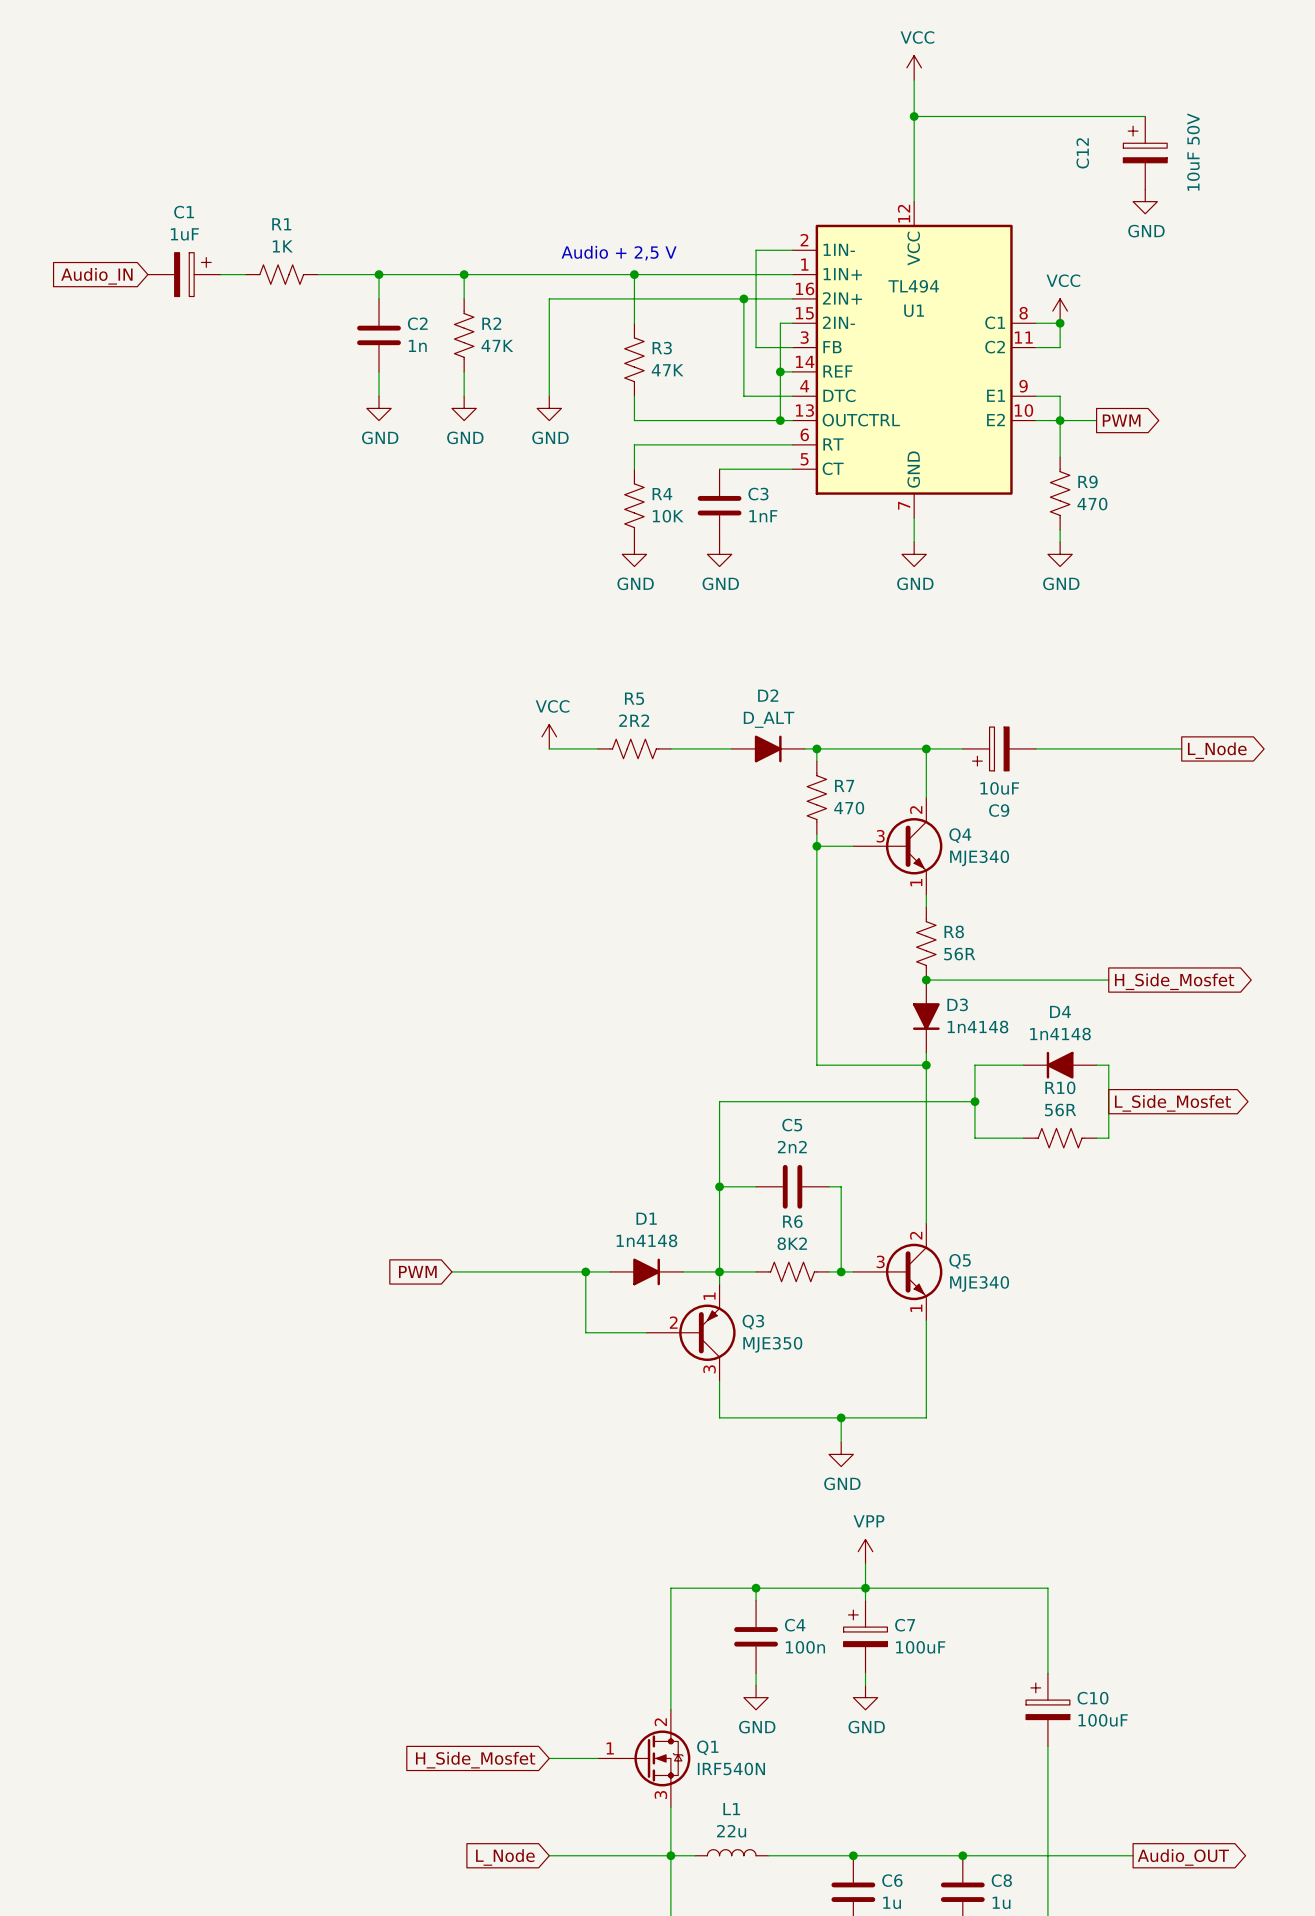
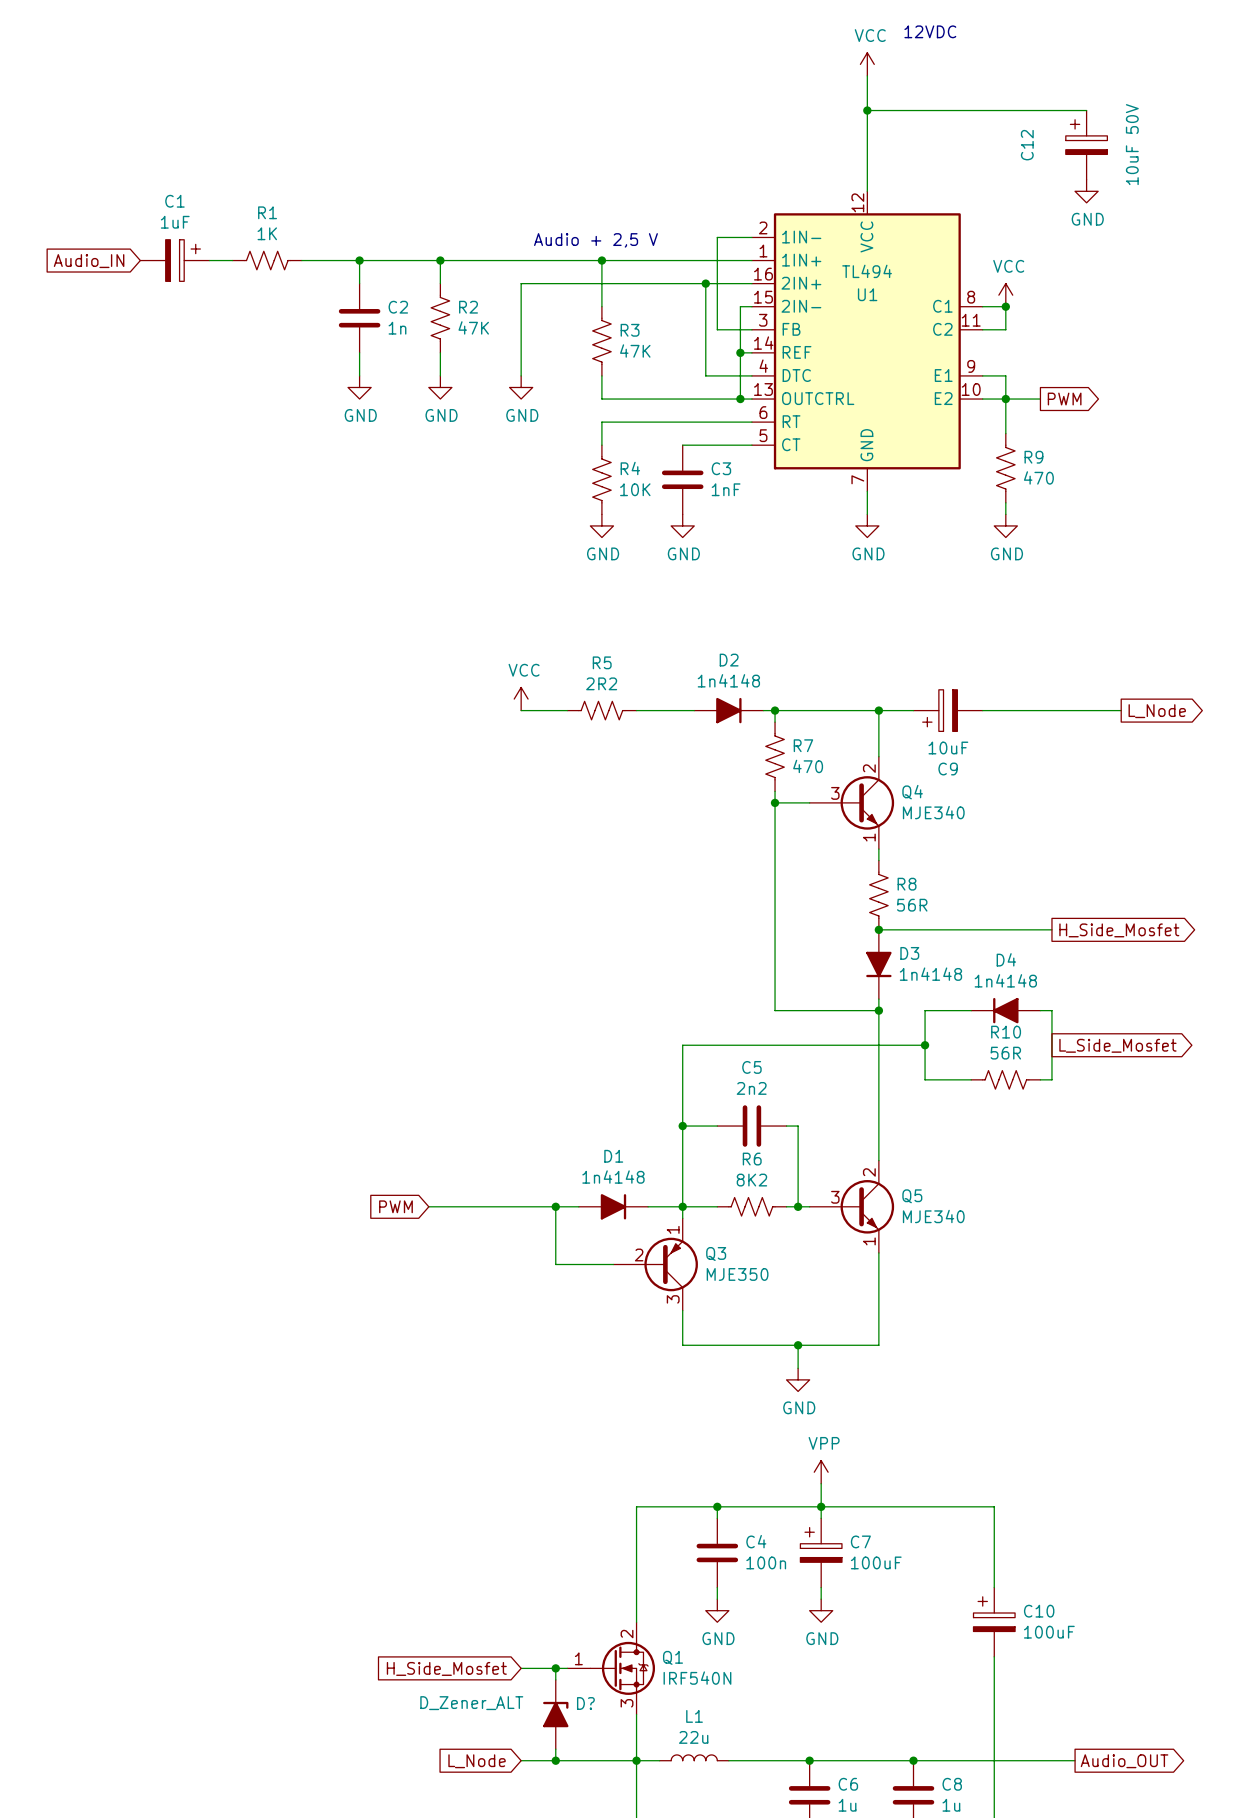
text: none -> 12VDC (930, 31)
D2 value: D_ALT (769, 719) -> 1n4148 (728, 680)
wire: none -> (555, 1668) (555, 1679)
junction: none -> (555, 1668)
D?: none -> D_Zener_ALT (555, 1714)
wire: none -> (555, 1749) (555, 1760)
junction: none -> (555, 1760)

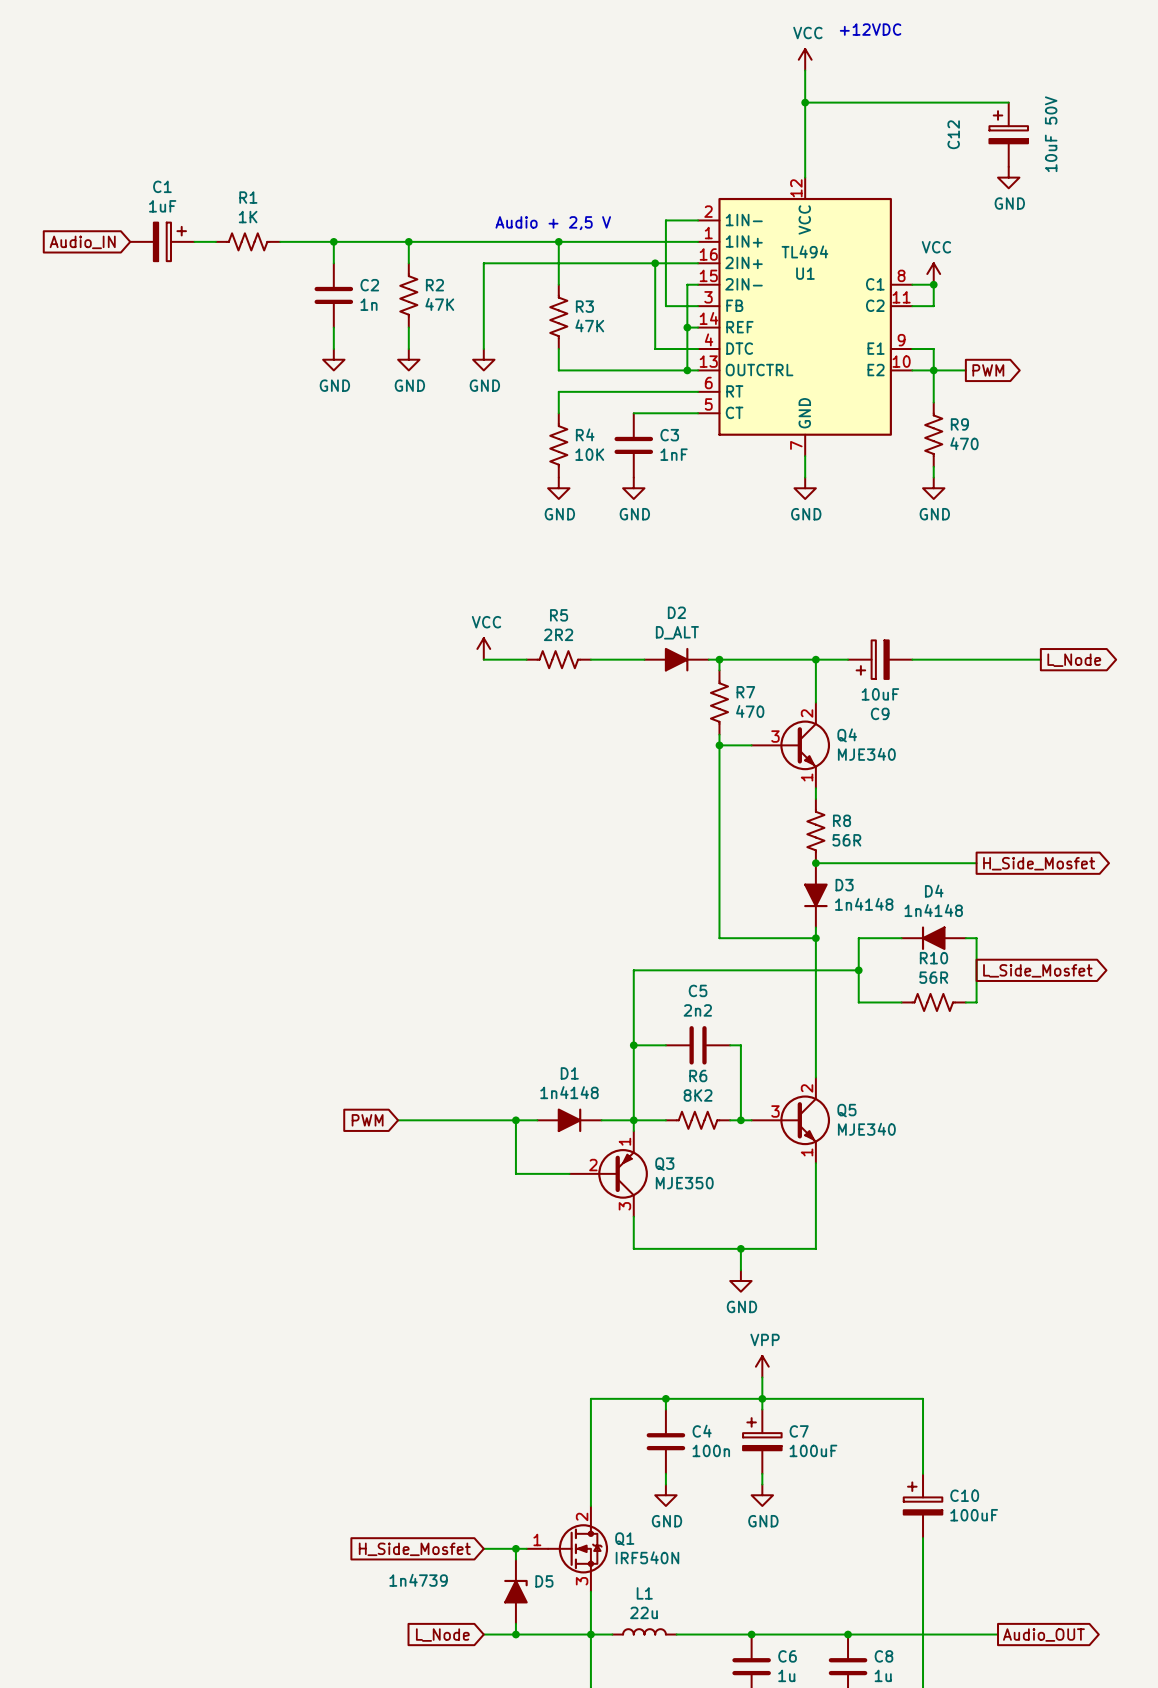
text: 12VDC (930, 31) -> +12VDC (870, 29)
D2 value: 1n4148 (728, 680) -> D_ALT (677, 632)
D? value: D_Zener_ALT (471, 1703) -> 1n4739 (418, 1580)
D? name: D? (585, 1703) -> D5 (544, 1581)

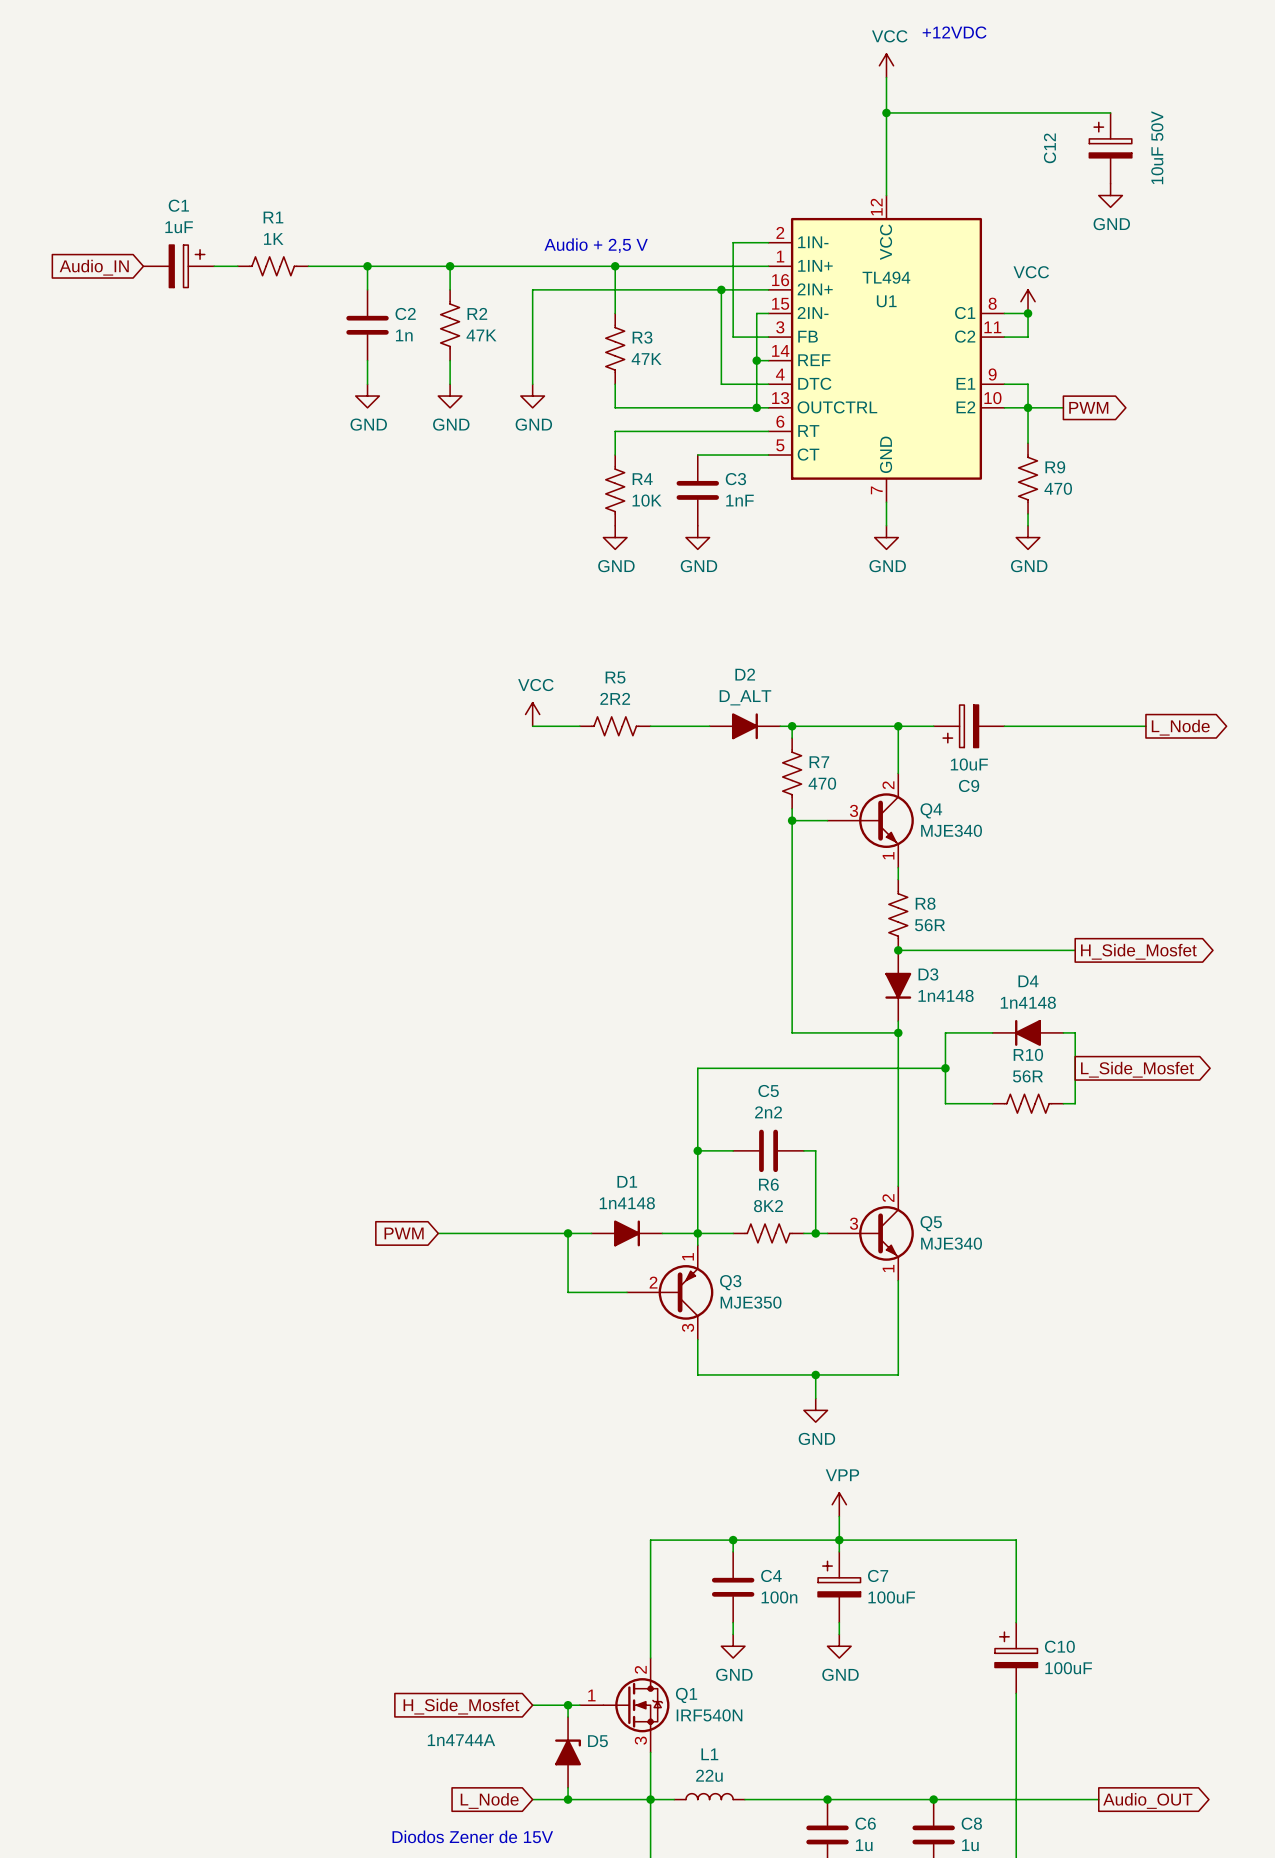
D5 value: 1n4739 (418, 1580) -> 1n4744A (461, 1740)
text: none -> Diodos Zener de 15V (472, 1836)

